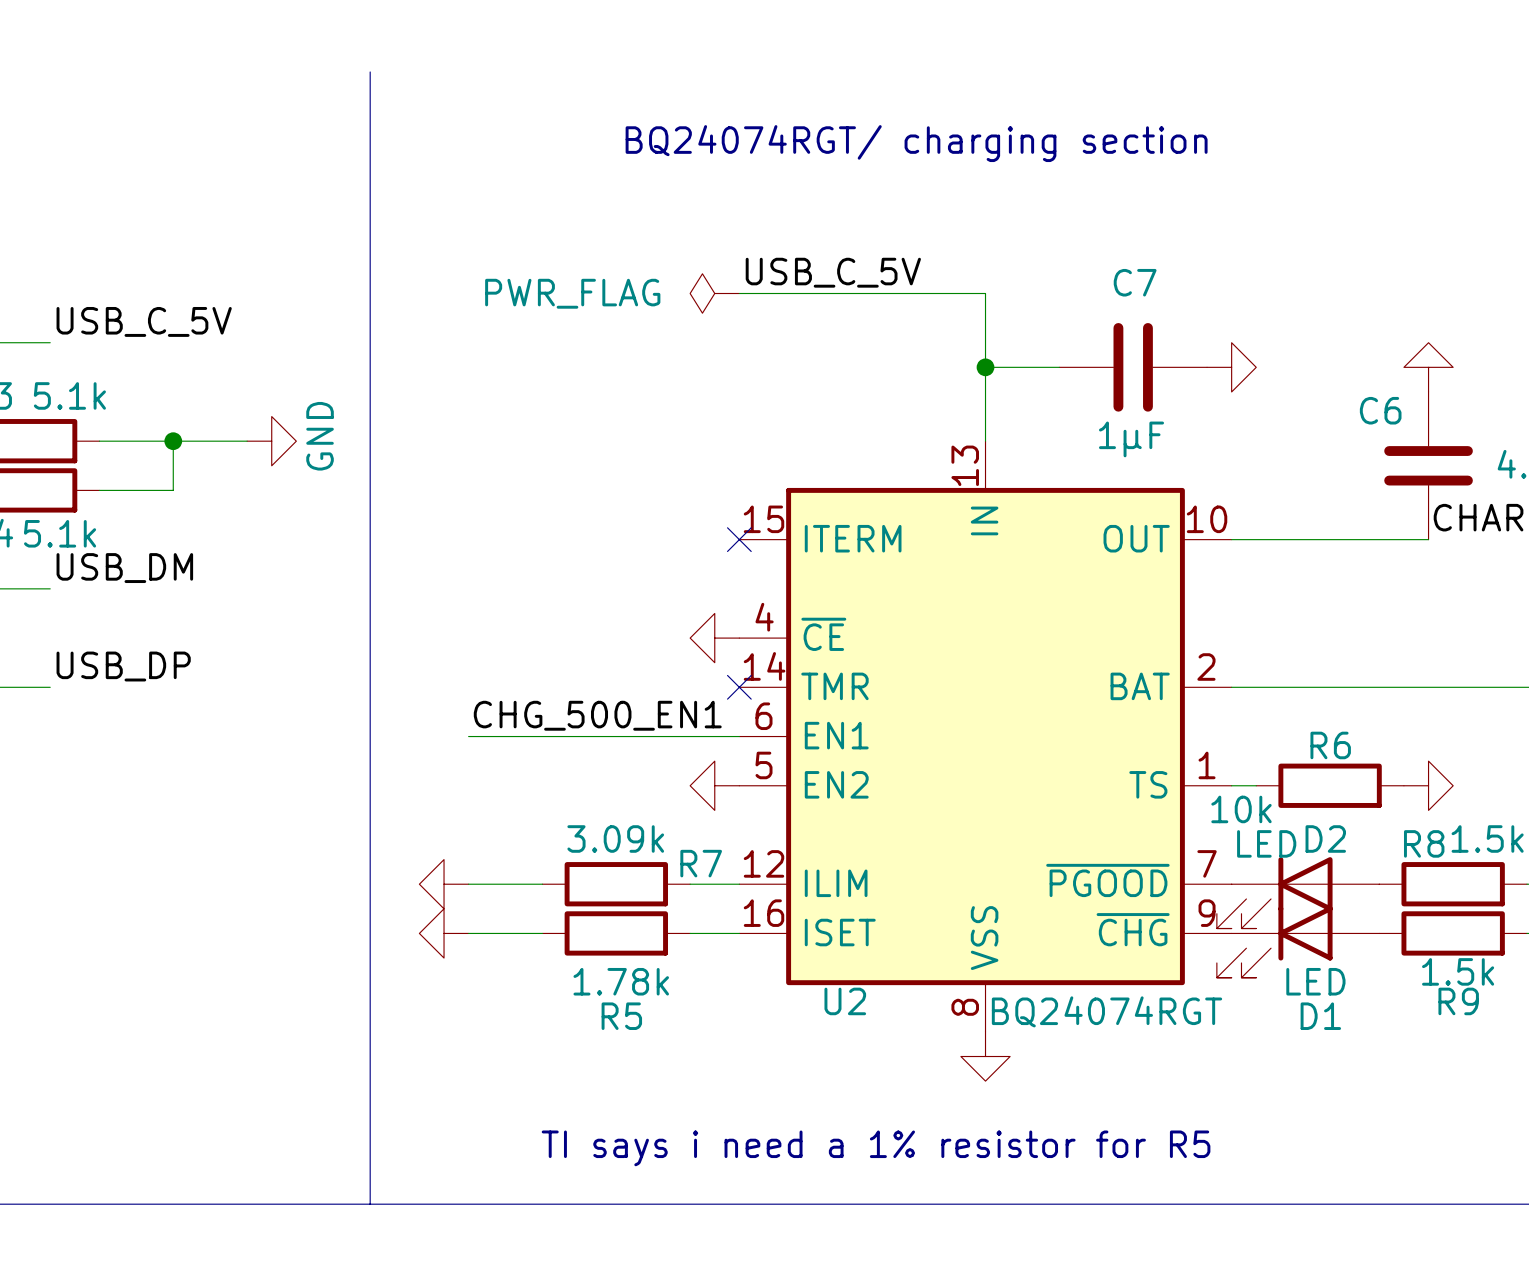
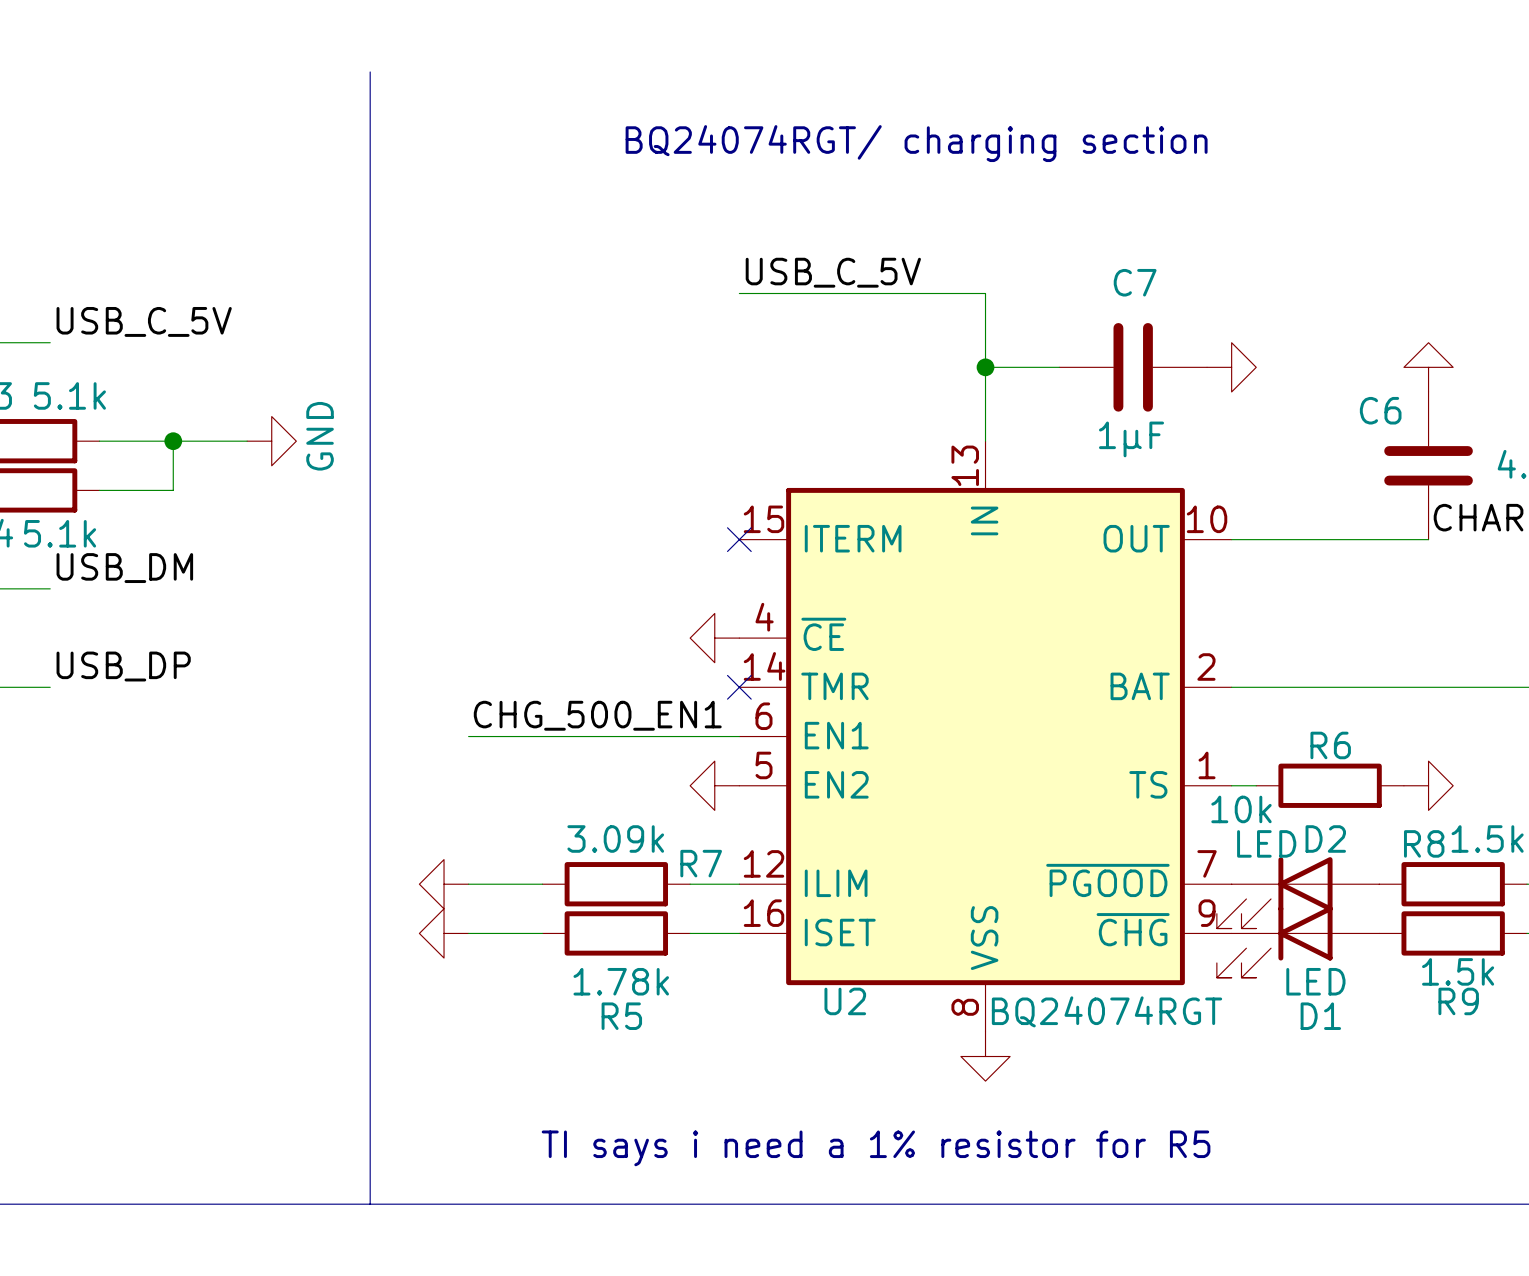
power symbol: PWR_FLAG (714, 293) -> none

